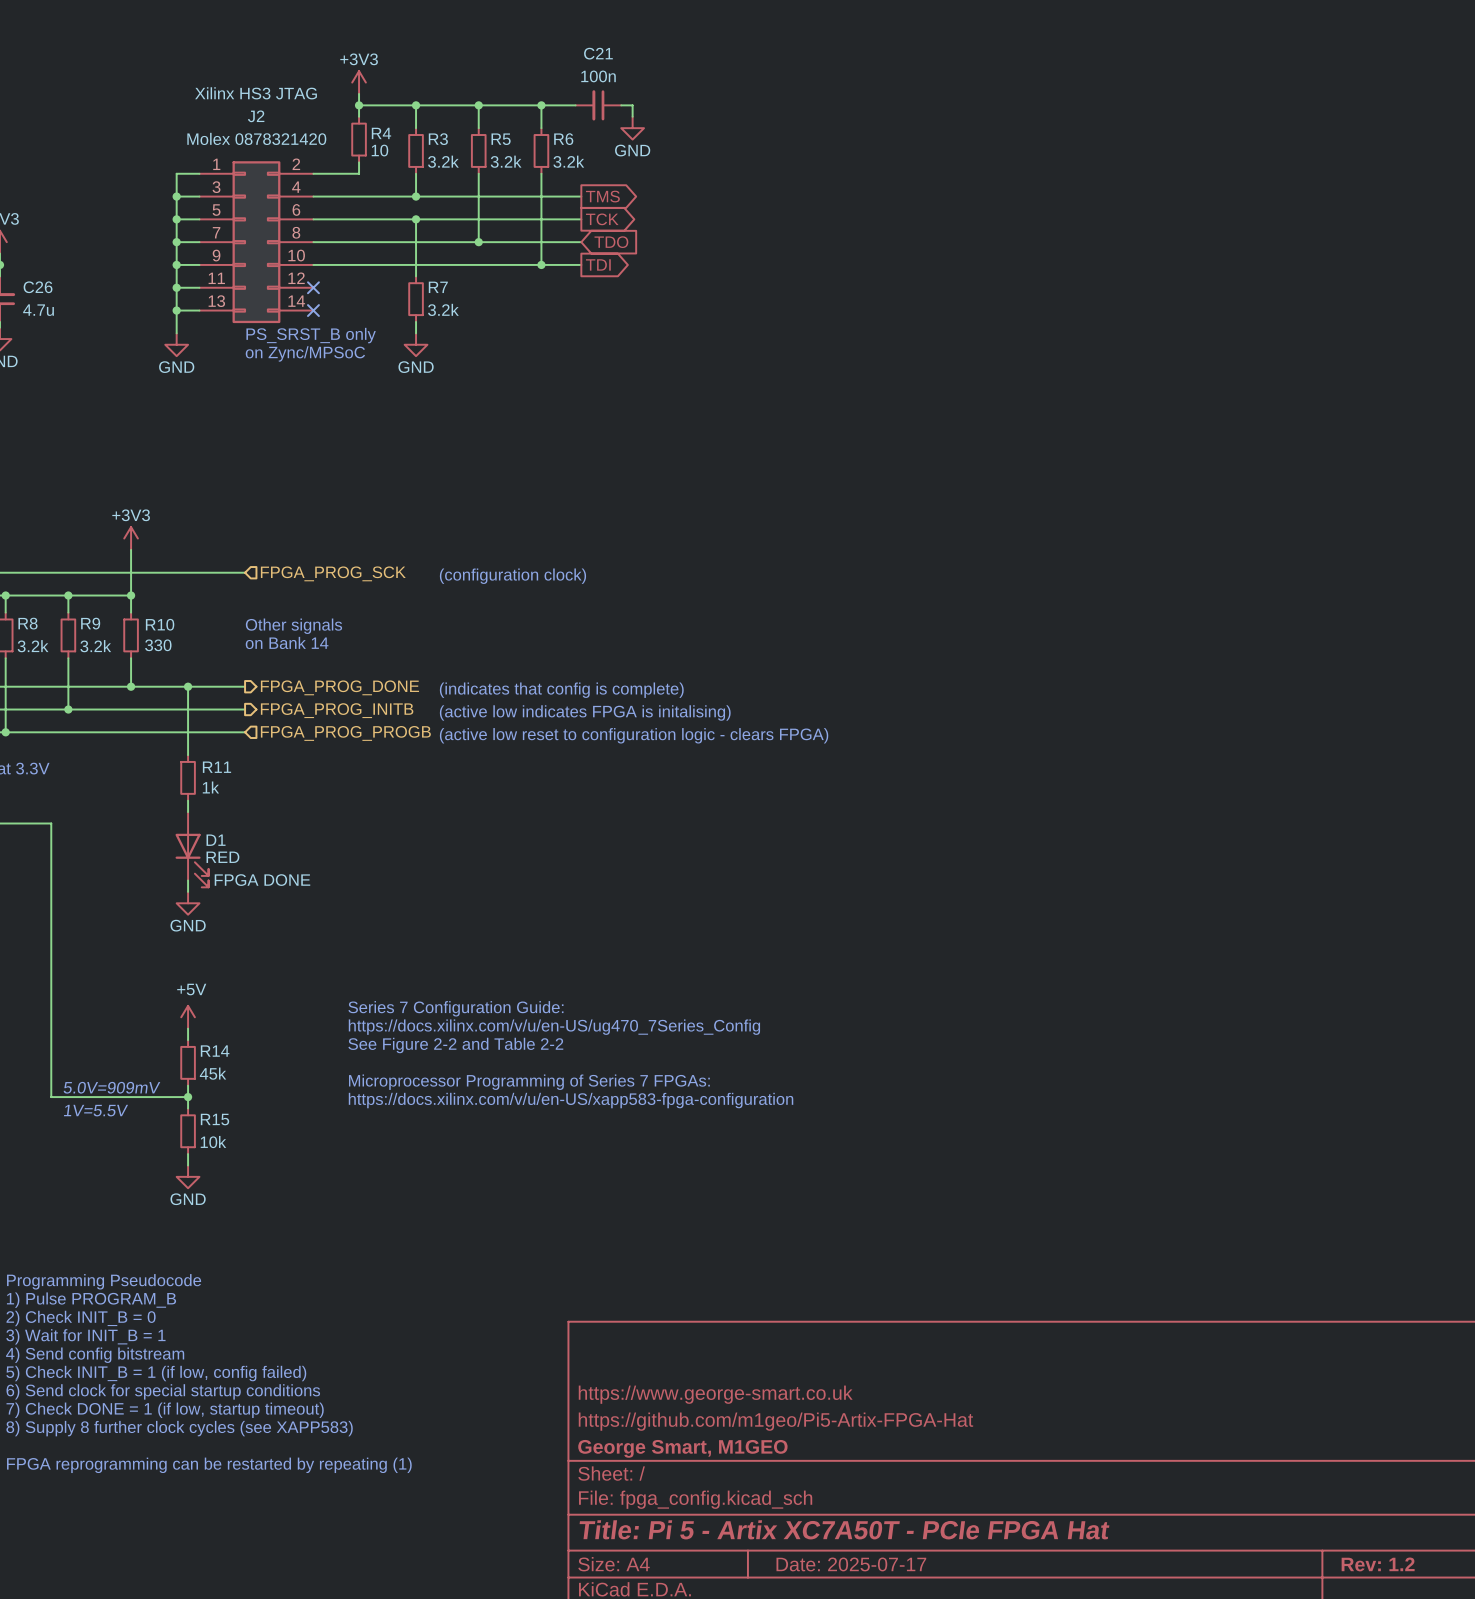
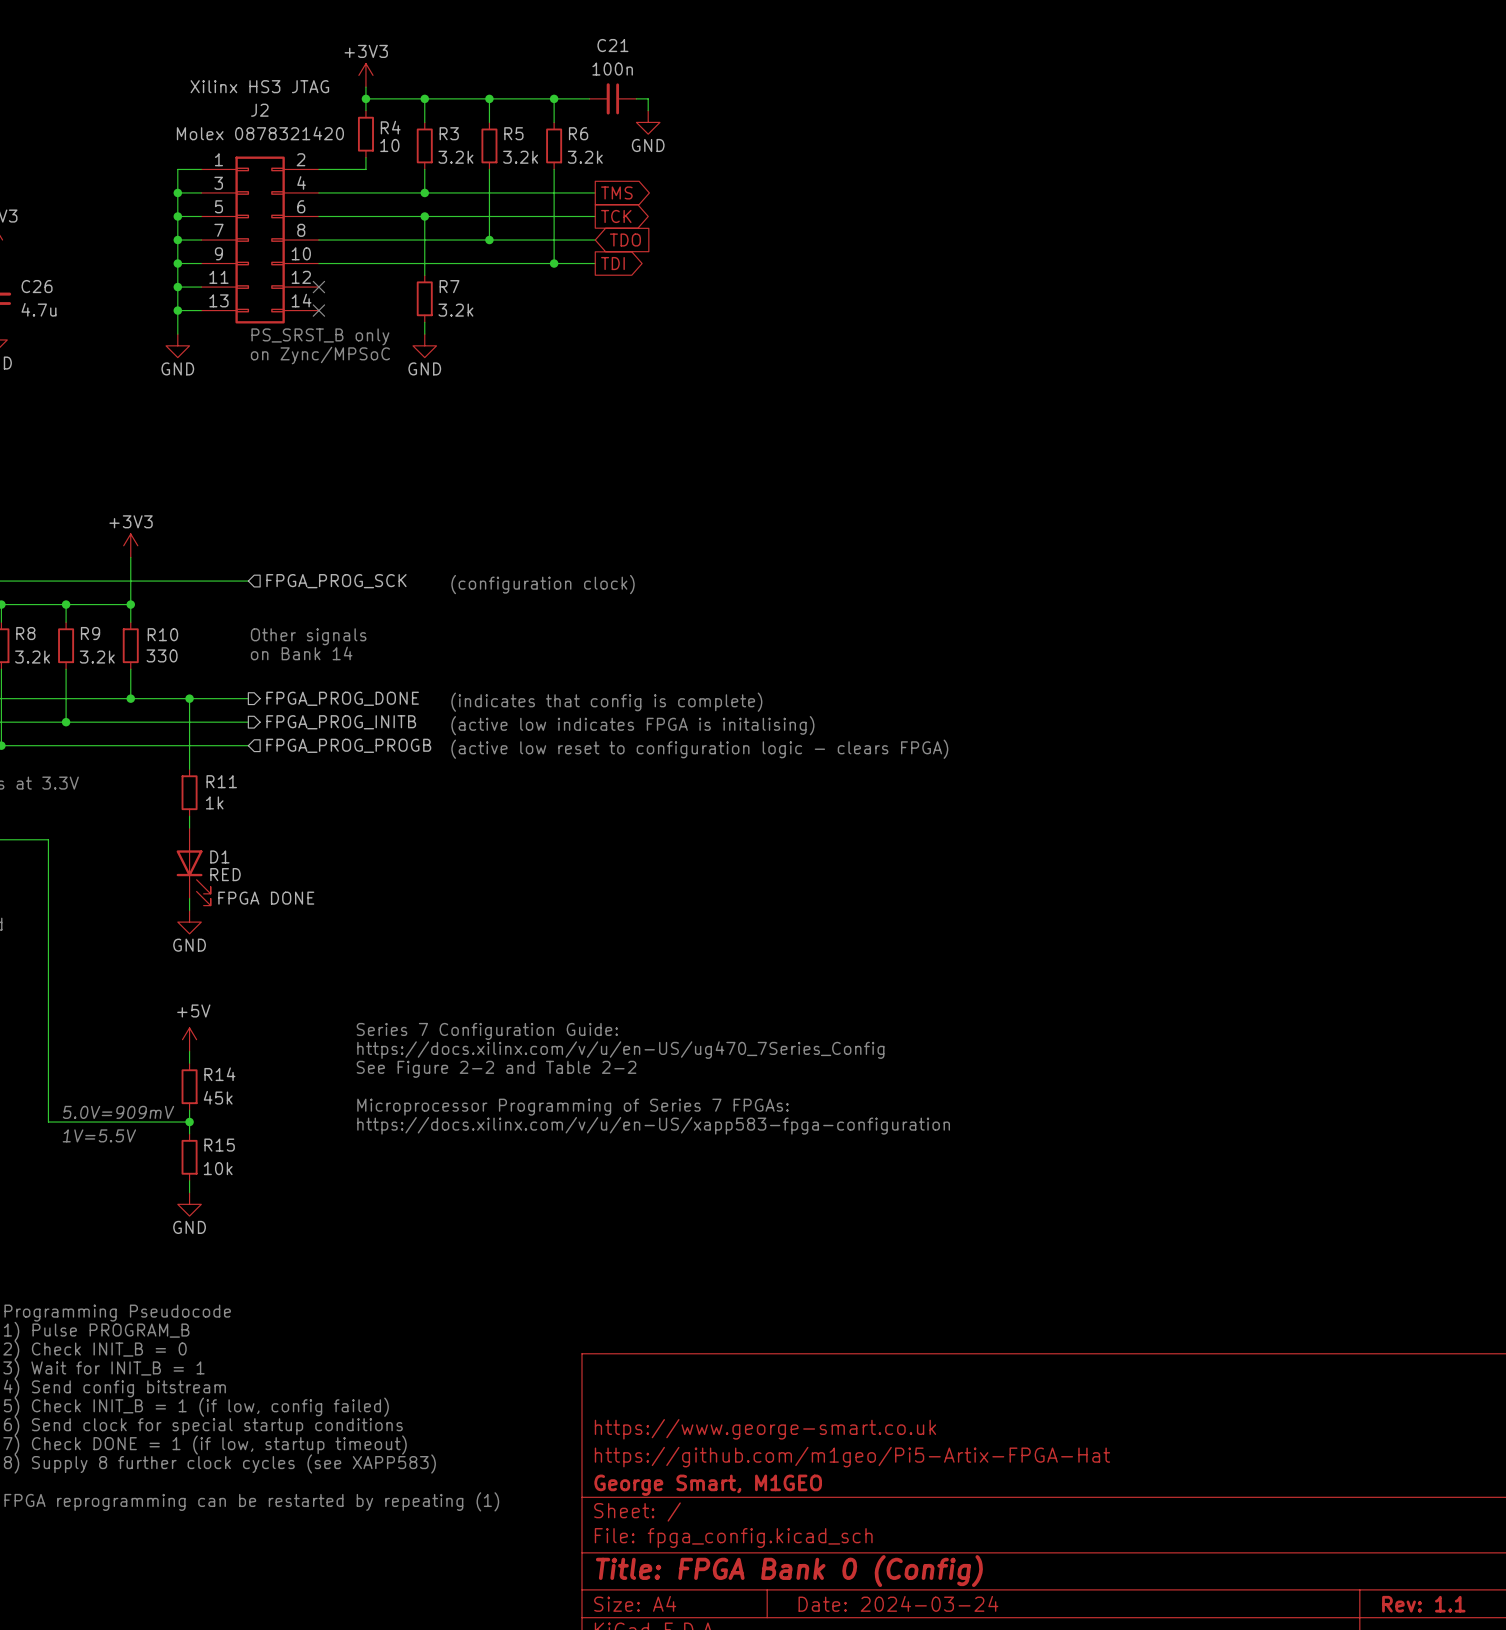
title block: Title: Pi 5 - Artix XC7A50T - PCIe FPGA Hat (844, 1529) -> Title: FPGA Bank 0 (Config) (789, 1571)
title block: Date: 2025-07-17 (851, 1564) -> Date: 2024-03-24 (898, 1603)
title block: Rev: 1.2 (1378, 1564) -> Rev: 1.1 (1423, 1604)

